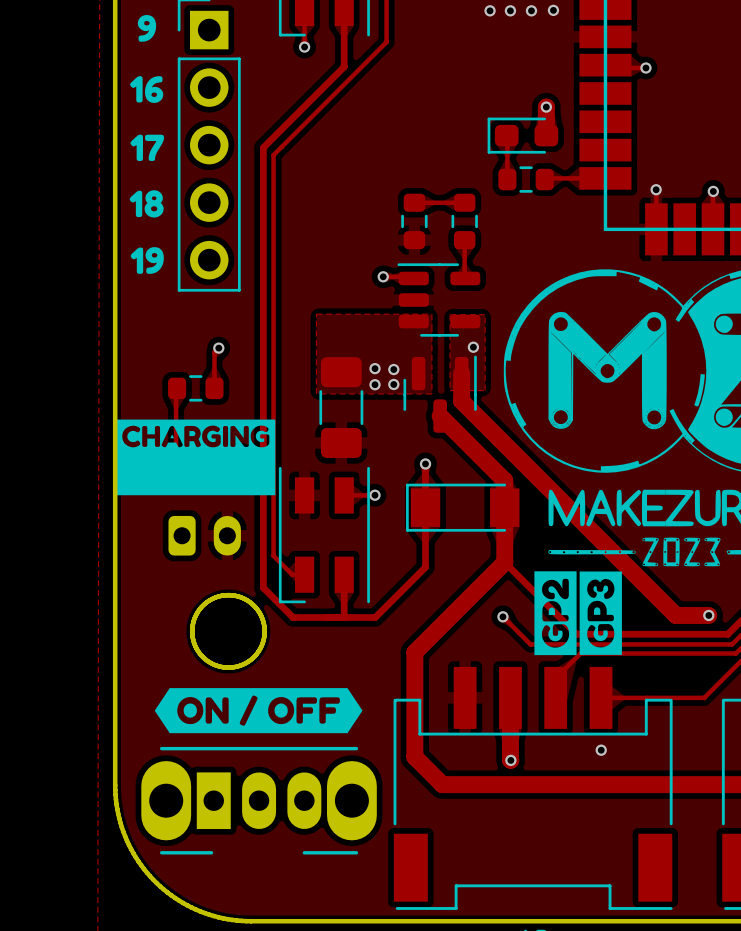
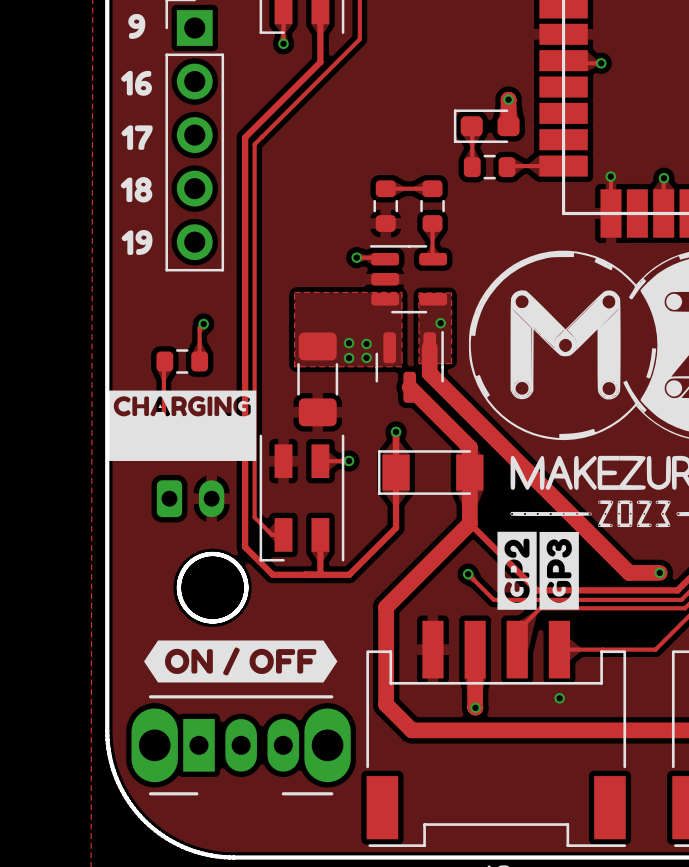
via: (490, 10) -> none
via: (510, 10) -> none
via: (531, 10) -> none
via: (553, 10) -> none

